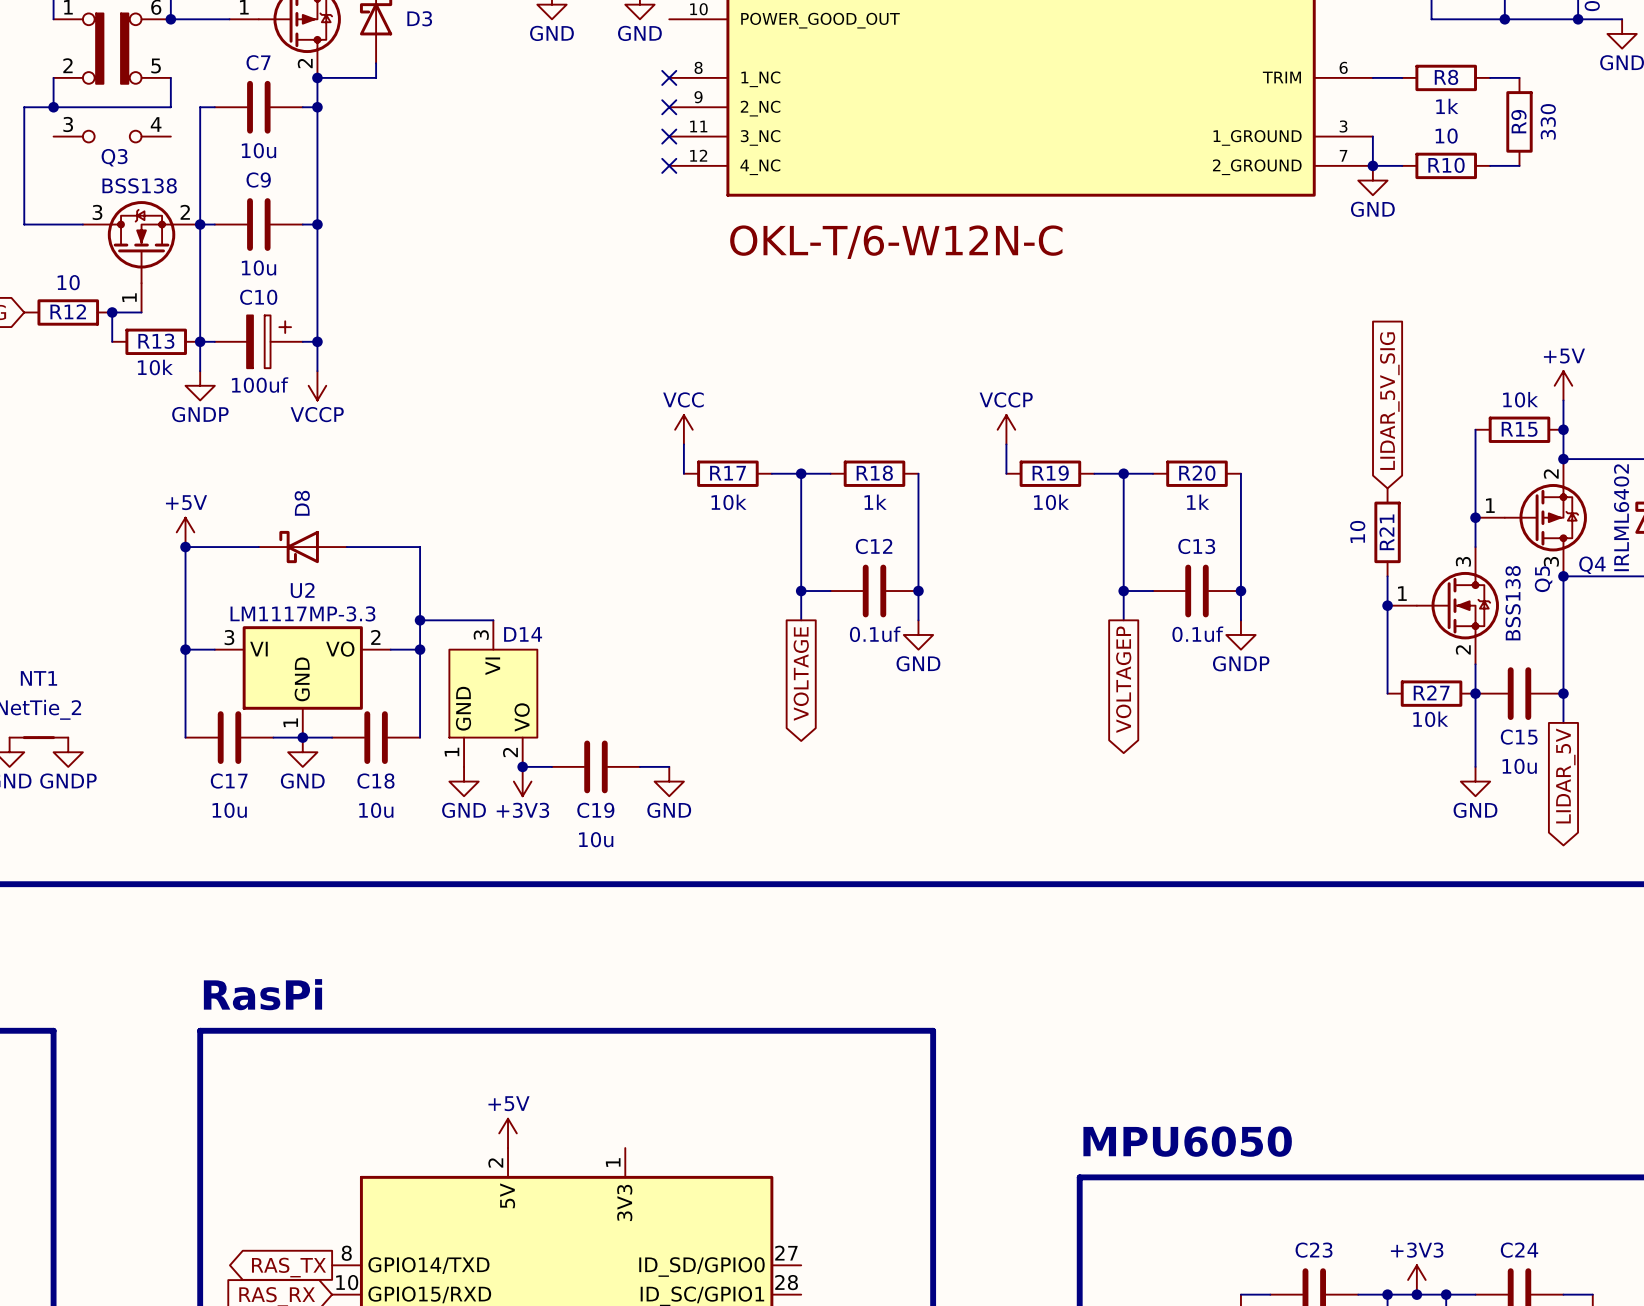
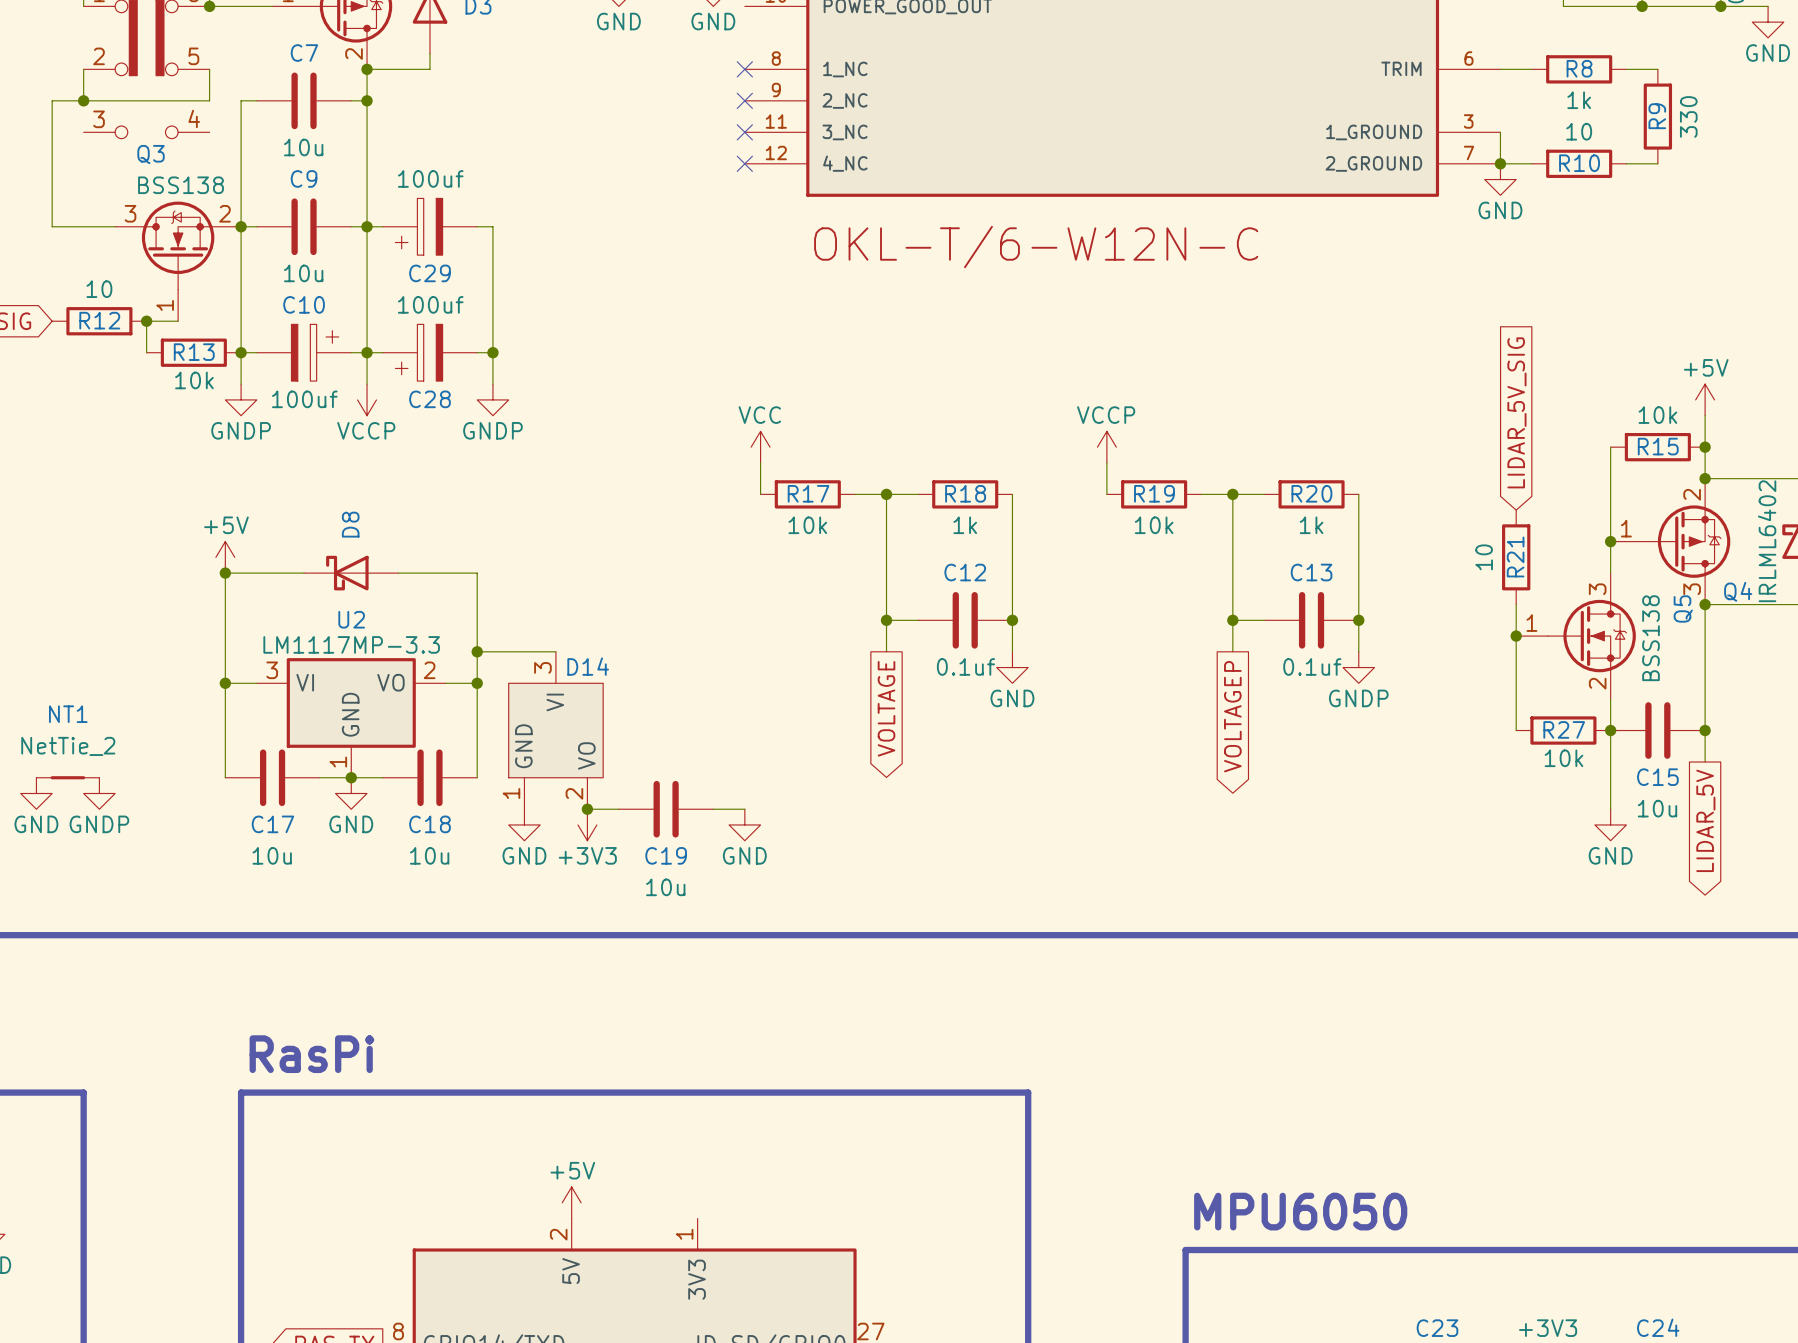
wire: none -> (367, 226) (382, 226)
C29: none -> 100uf (429, 226)
wire: none -> (477, 226) (492, 226) (492, 384)
wire: none -> (367, 352) (382, 352)
C28: none -> 100uf (429, 352)
wire: none -> (477, 352) (492, 352)
junction: none -> (492, 352)
power symbol: none -> GNDP (492, 399)

